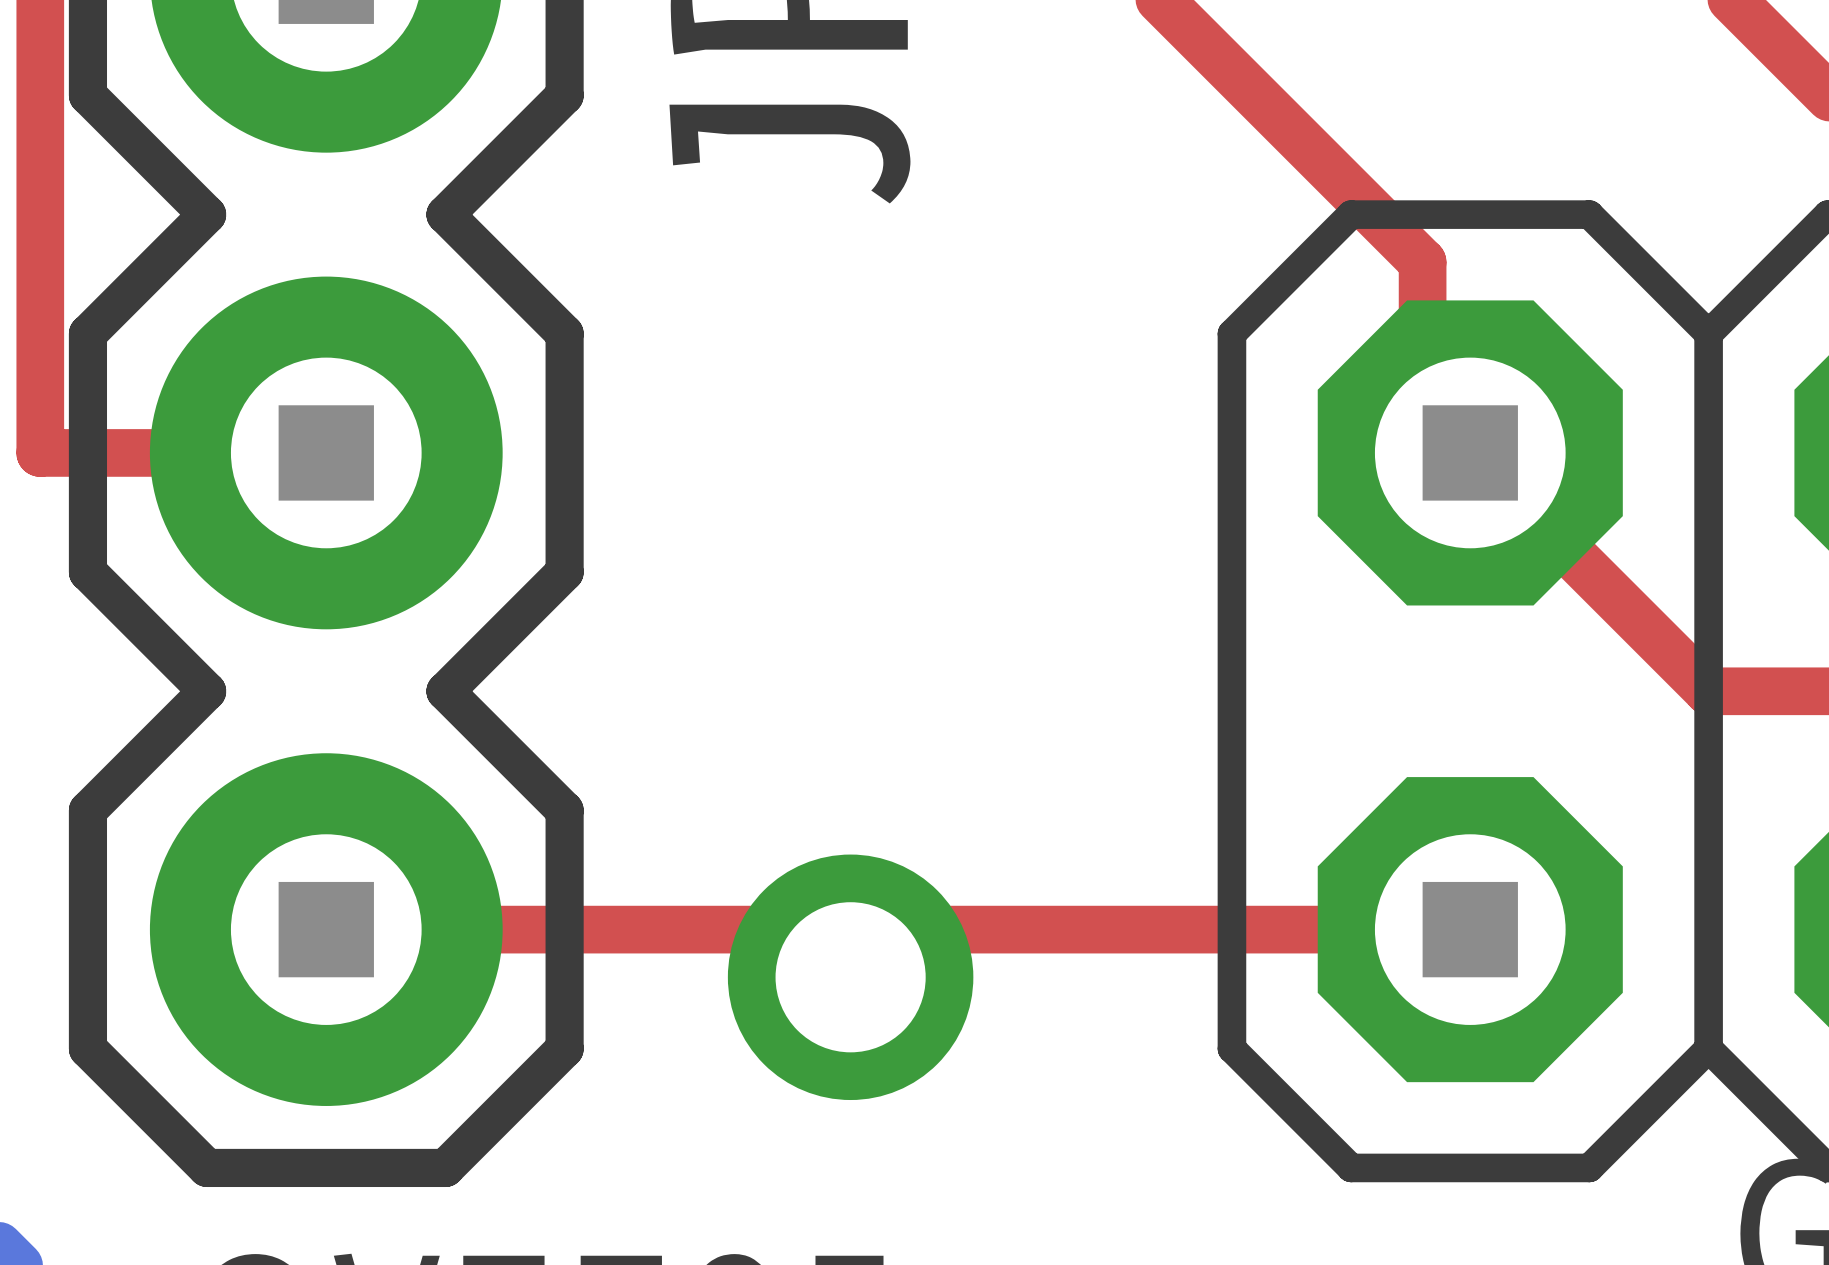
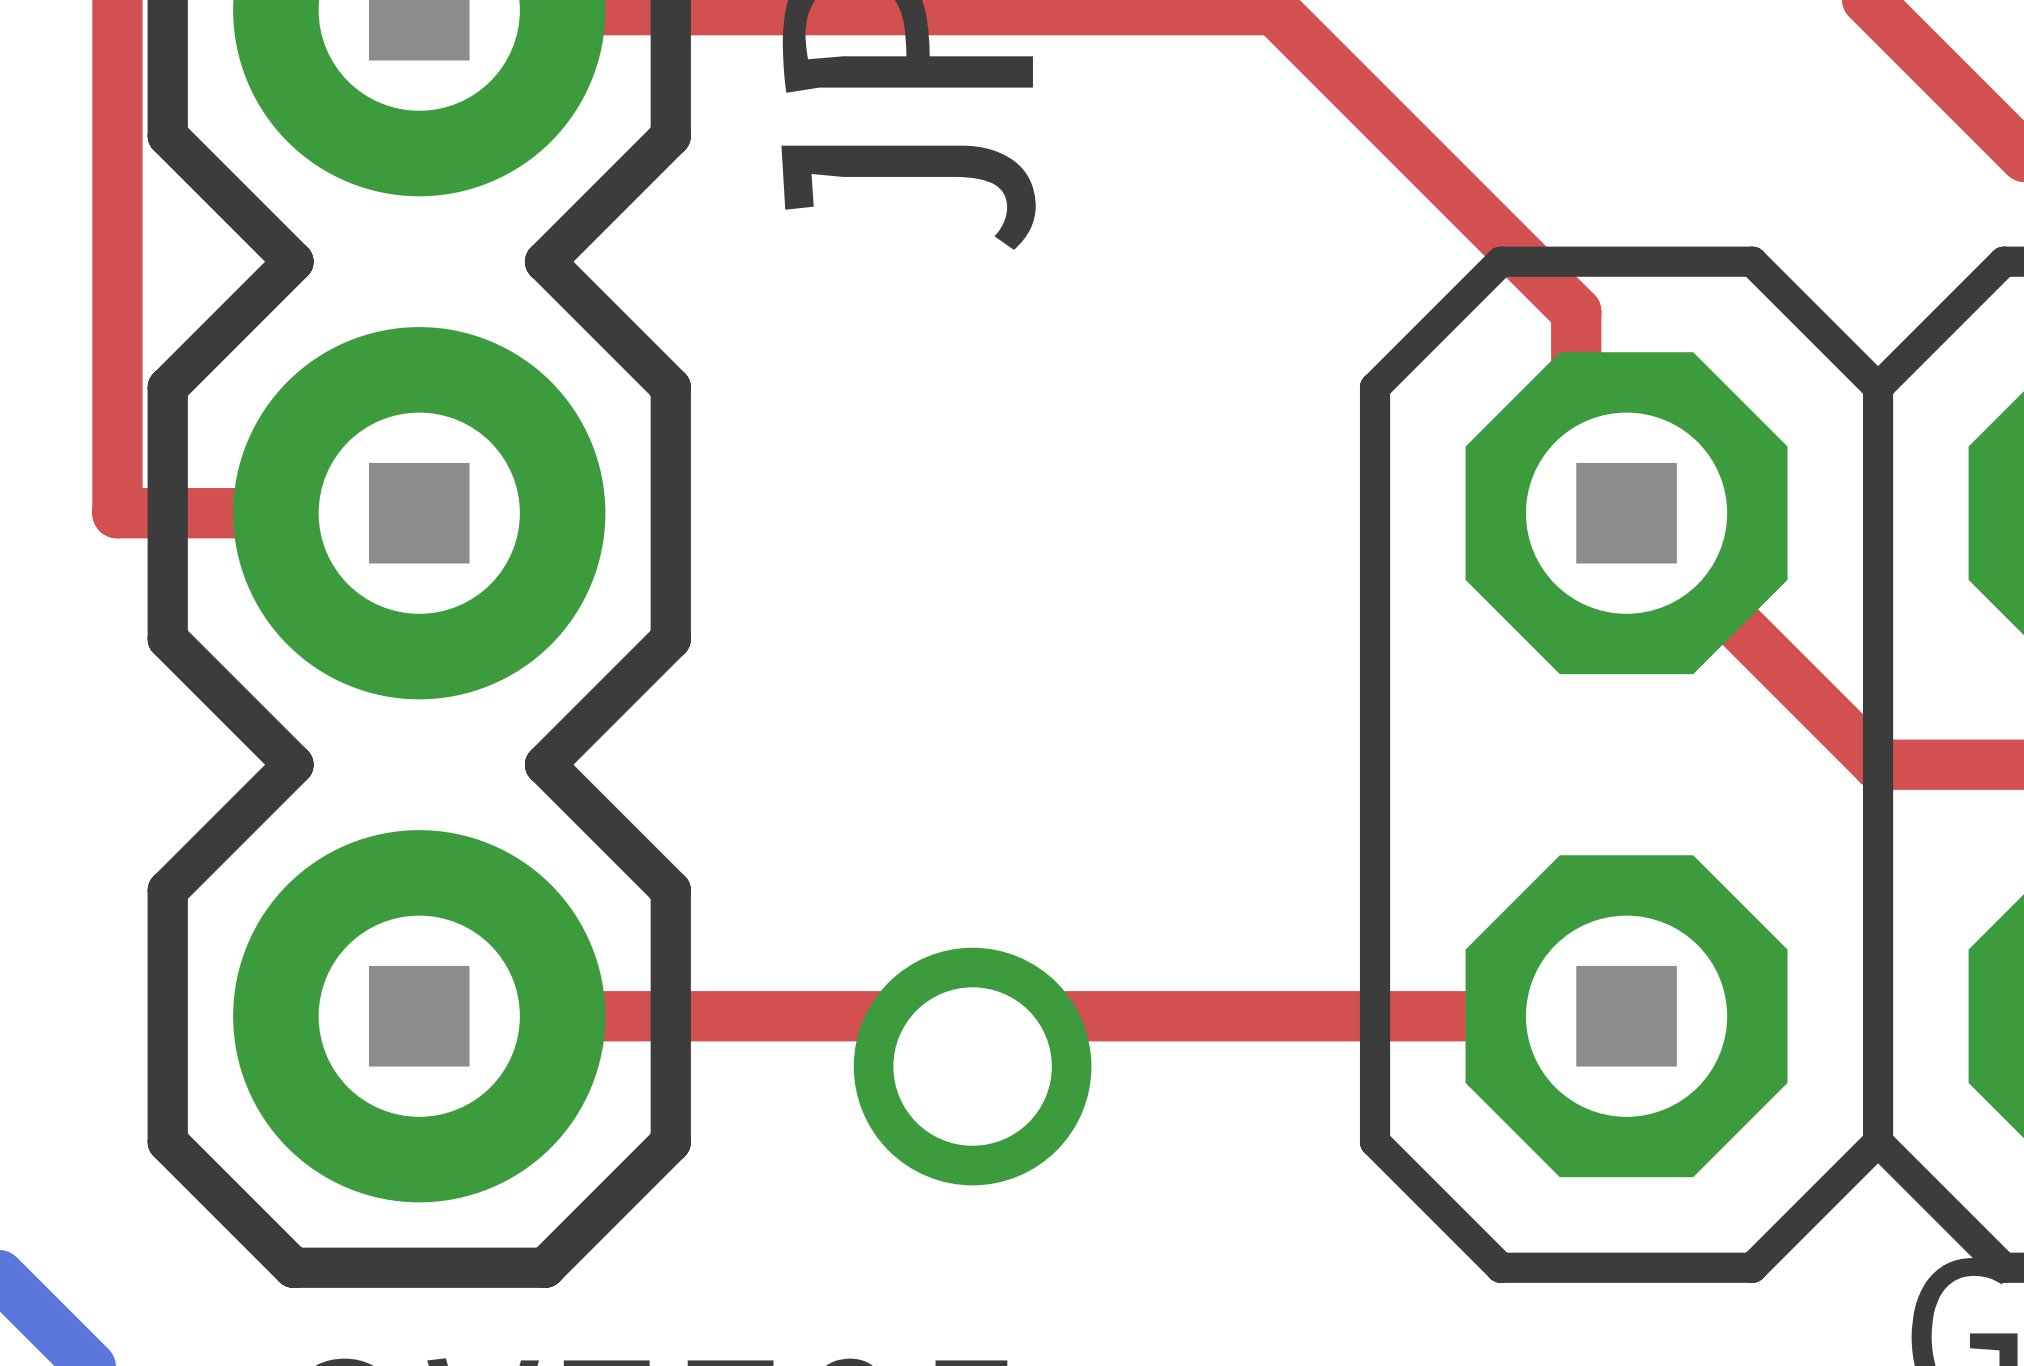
via size: [727, 854, 974, 1101] -> [853, 947, 1092, 1186]

